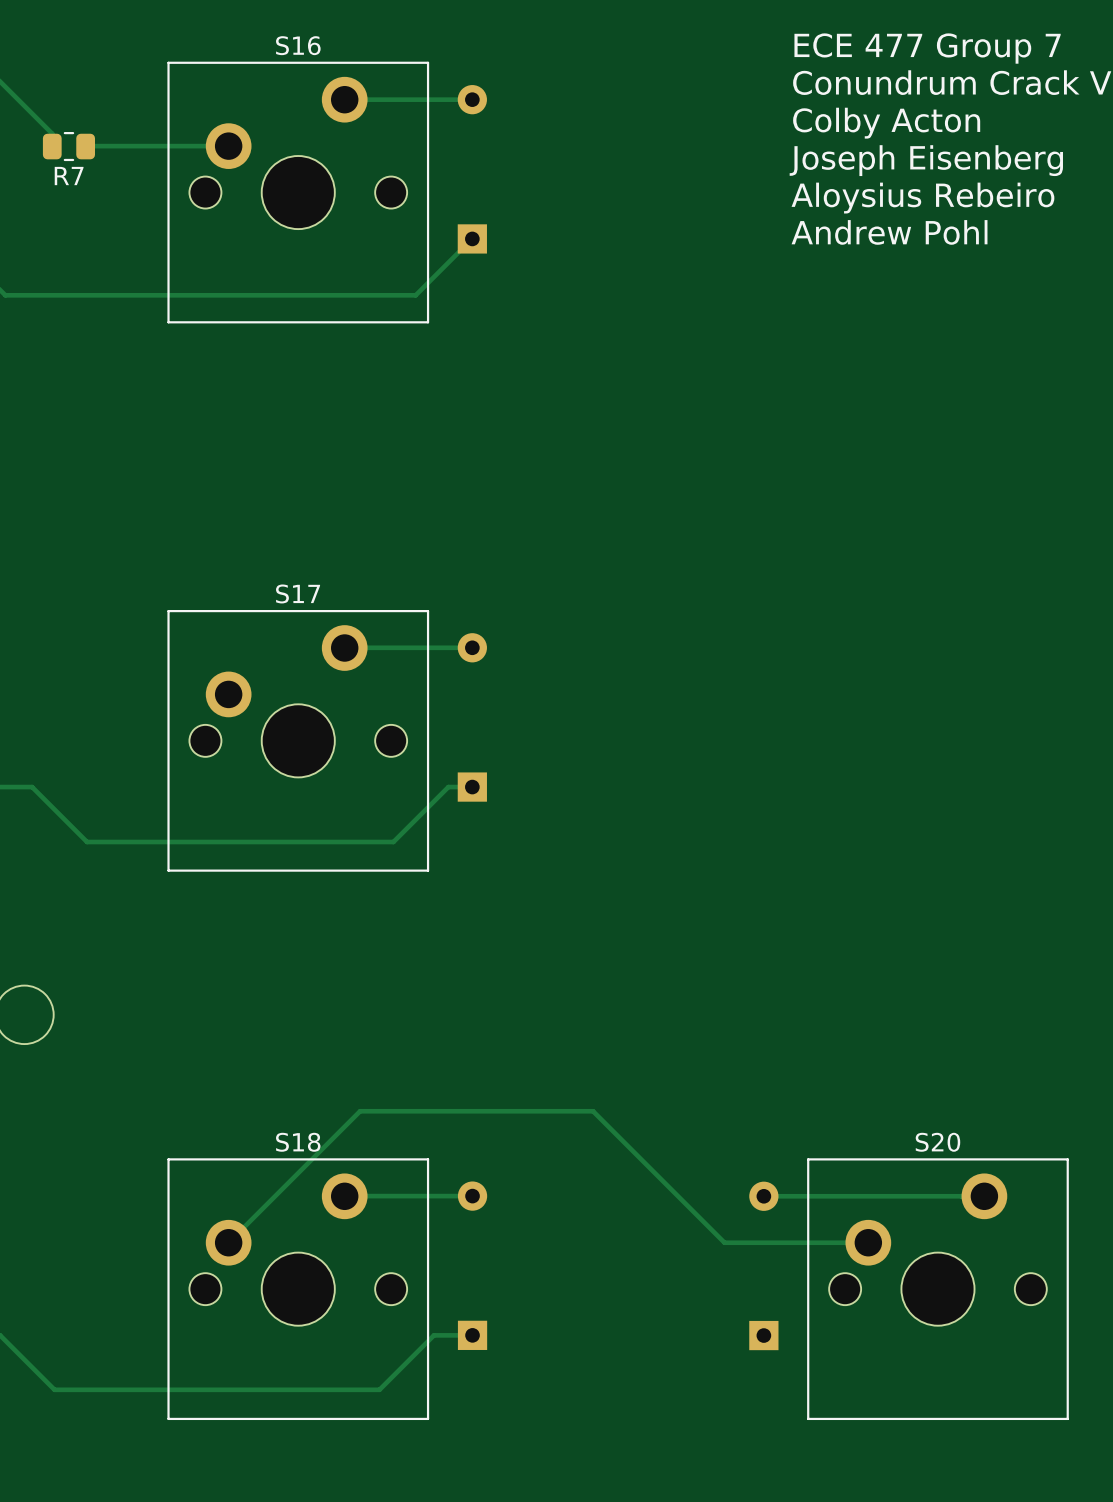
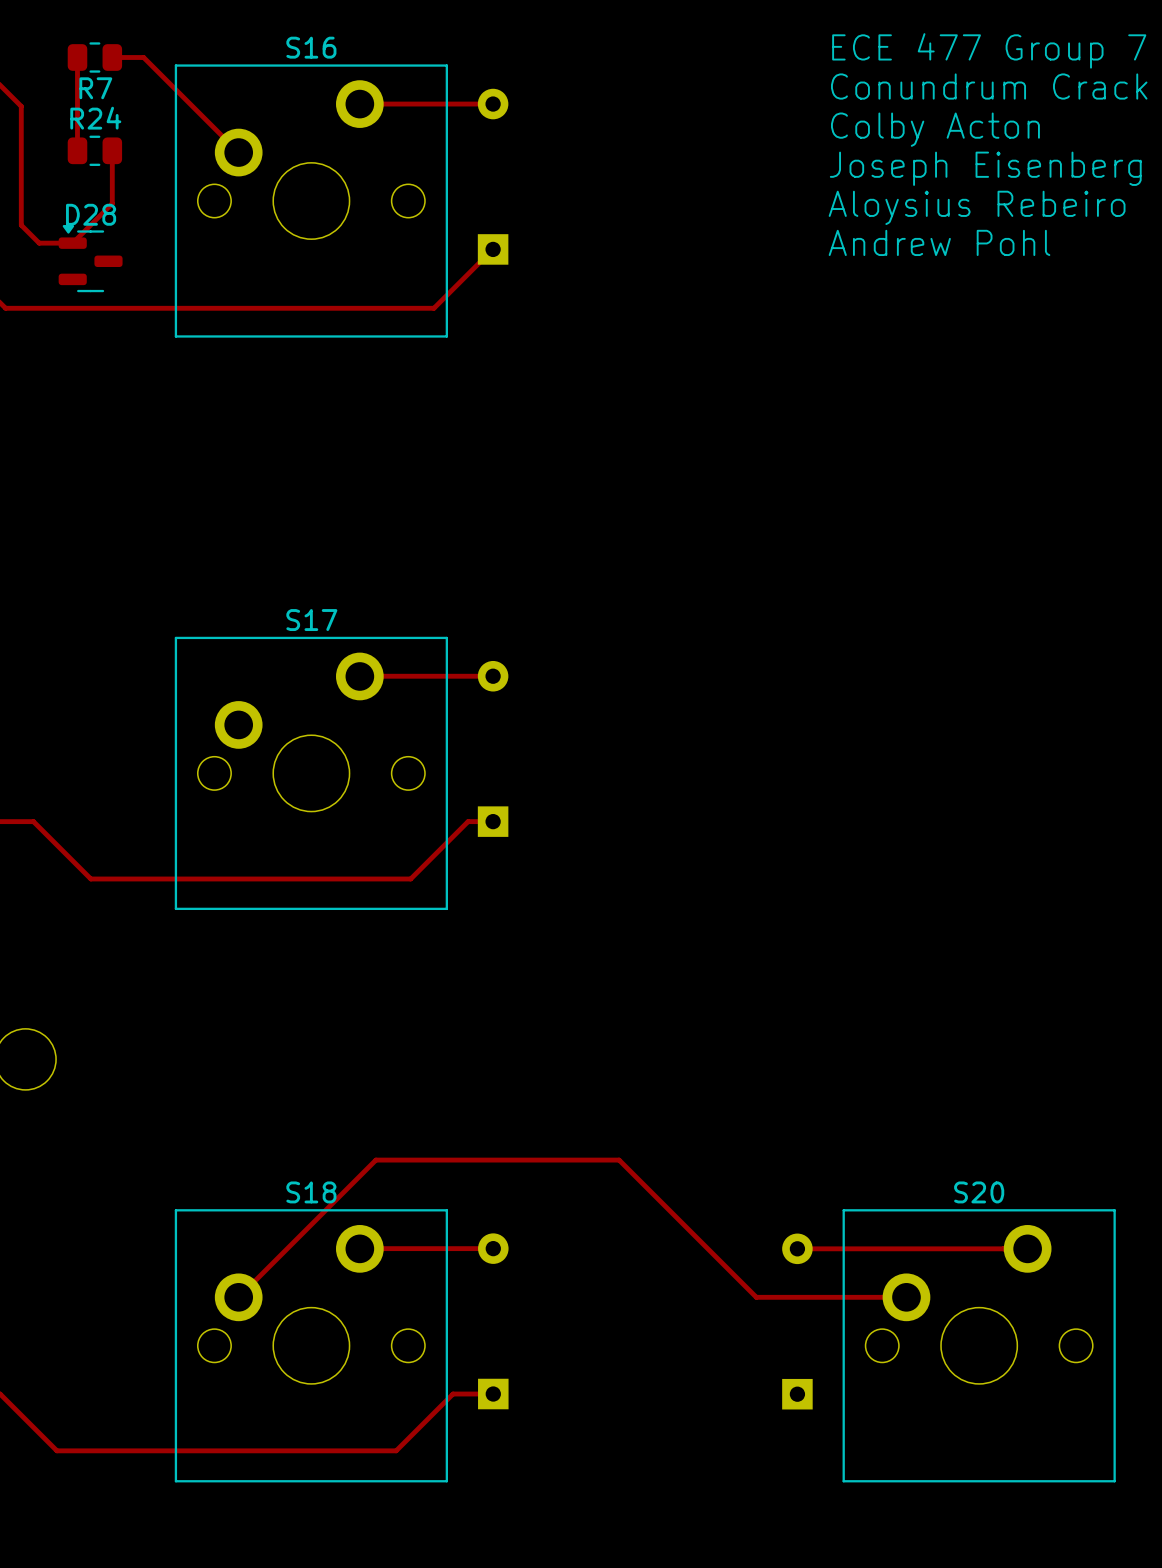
track: none -> (77, 57) (77, 150)
track: (20, 101) (52, 133) (52, 146) -> (21, 106) (21, 225) (39, 243) (72, 243) (112, 203) (112, 150)
R24: none -> (94, 150)
R7 position: (68, 146) -> (94, 57)
track: (228, 146) (85, 146) -> (238, 152) (143, 57) (112, 57)
D28: none -> (90, 258)

